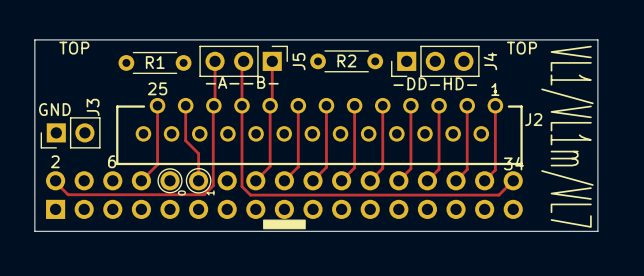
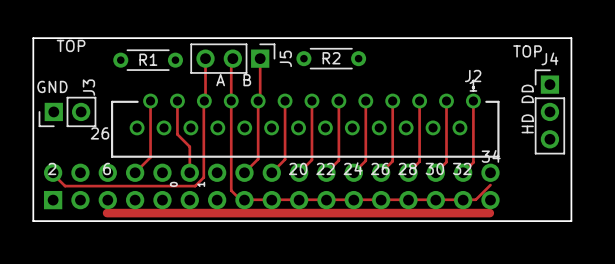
text position: TOP (522, 48) -> TOP (527, 51)
J4 rotation: 0° (435, 61) -> 90° clockwise (549, 111)
J4 position: (435, 61) -> (549, 111)
J4 name position: J4 (490, 61) -> J4 (549, 58)
text: -A--B- (242, 82) -> A B (233, 80)
text: -DD-HD- (435, 83) -> none
text: 25 (157, 88) -> none
text position: GND (54, 109) -> GND (52, 86)
text: none -> HD DD (527, 108)
J2 name position: J2 (533, 119) -> J2 (473, 76)
J3 position: (70, 132) -> (67, 111)
text: VL1/VL1m/VL7 (567, 136) -> none
text: none -> 26 (100, 133)
text position: 2 (55, 161) -> 2 (52, 168)
text position: 6 (112, 161) -> 6 (107, 168)
drawing: [157, 167, 212, 194] -> none
text: none -> 20 (298, 168)
text: none -> 22 (325, 168)
text: none -> 24 (353, 168)
text: none -> 26 (380, 168)
text: none -> 28 (407, 168)
text: none -> 30 (434, 168)
text: none -> 32 (462, 168)
track: (513, 180) (498, 195) (250, 195) (241, 186) -> (490, 185) (475, 199) (240, 199) (231, 190) (231, 178)
drawing: [263, 219, 306, 230] -> none
track: none -> (107, 213) (489, 213)

